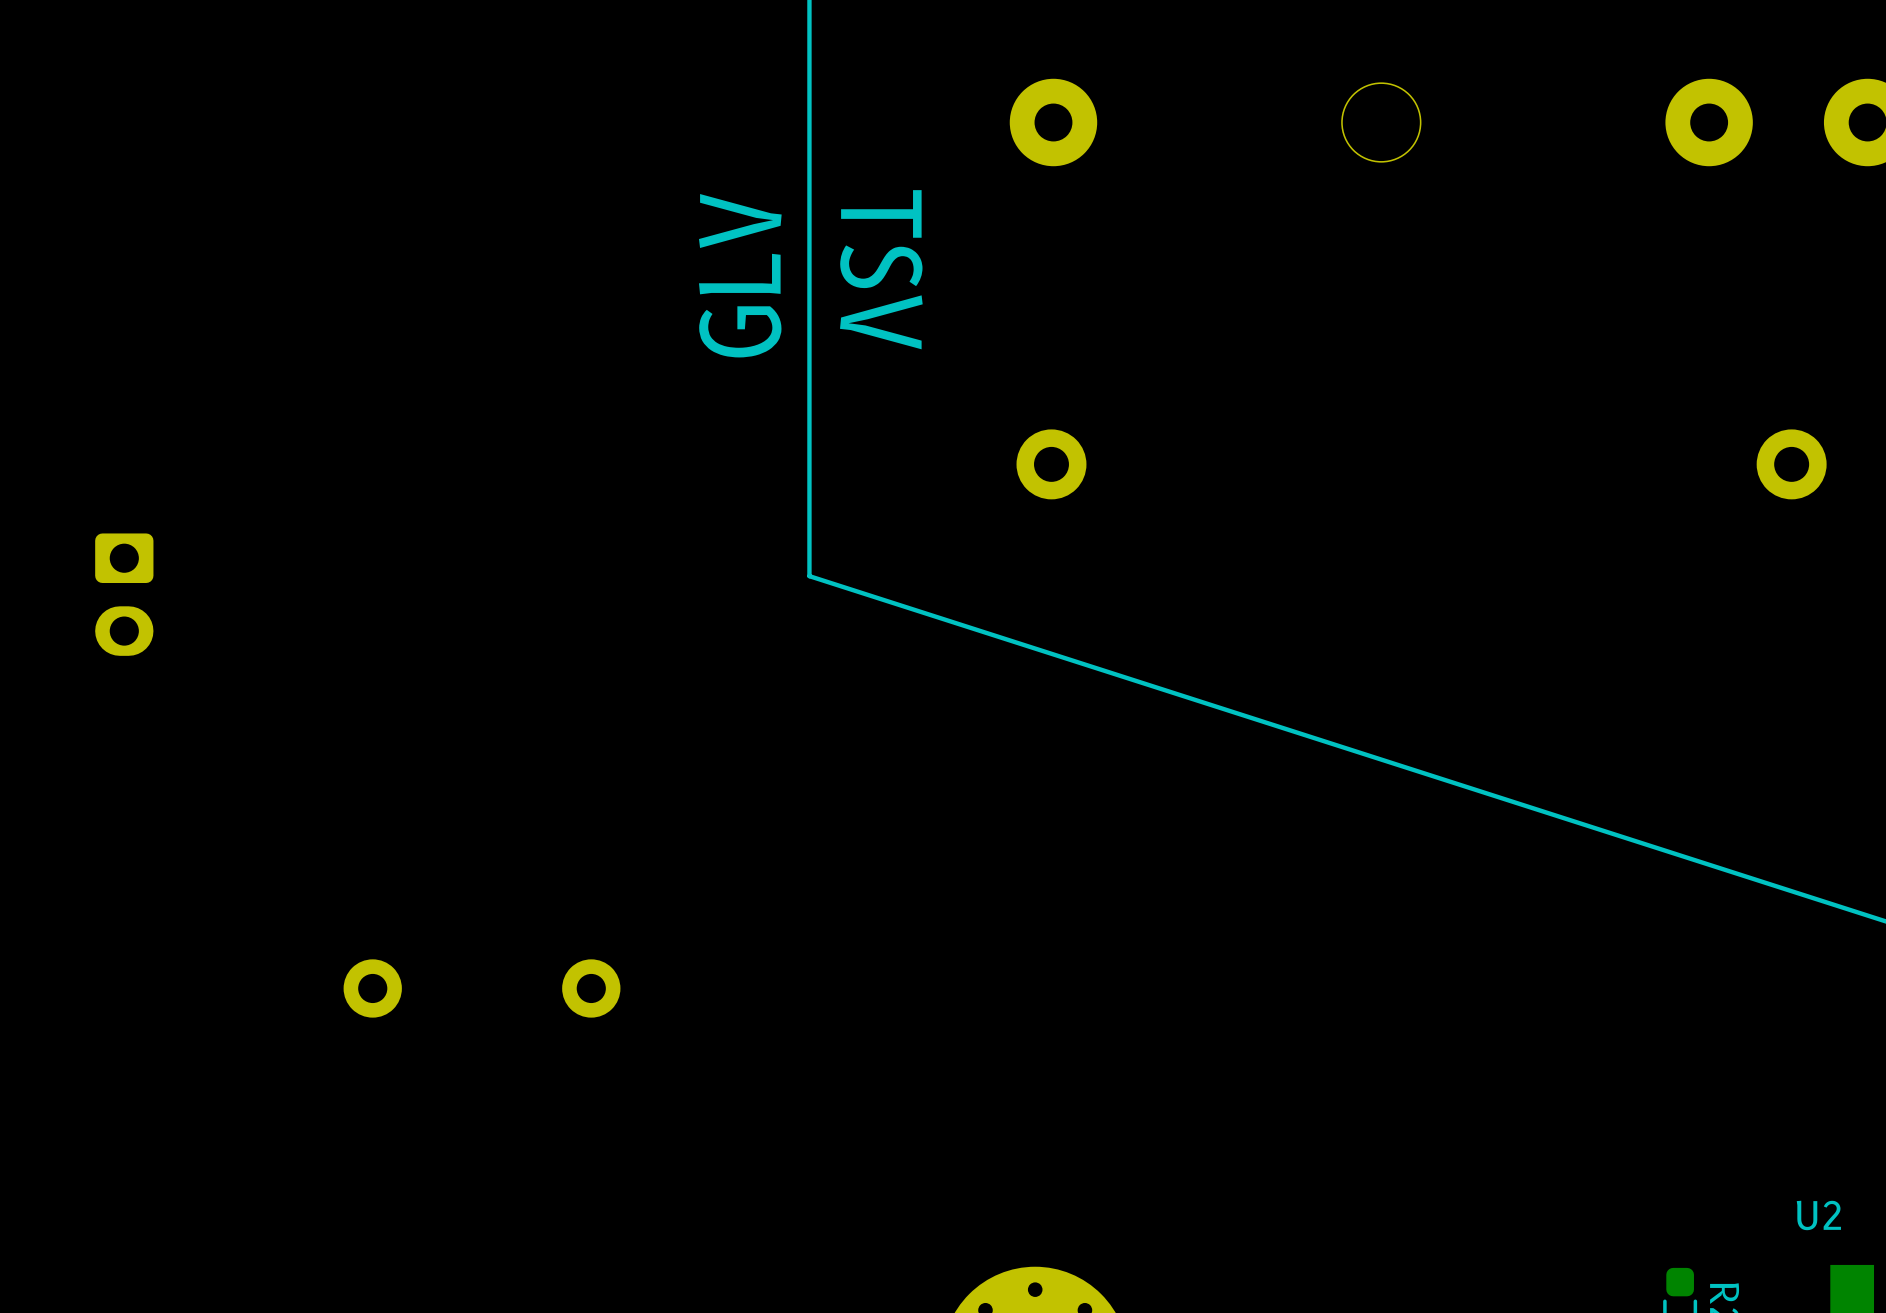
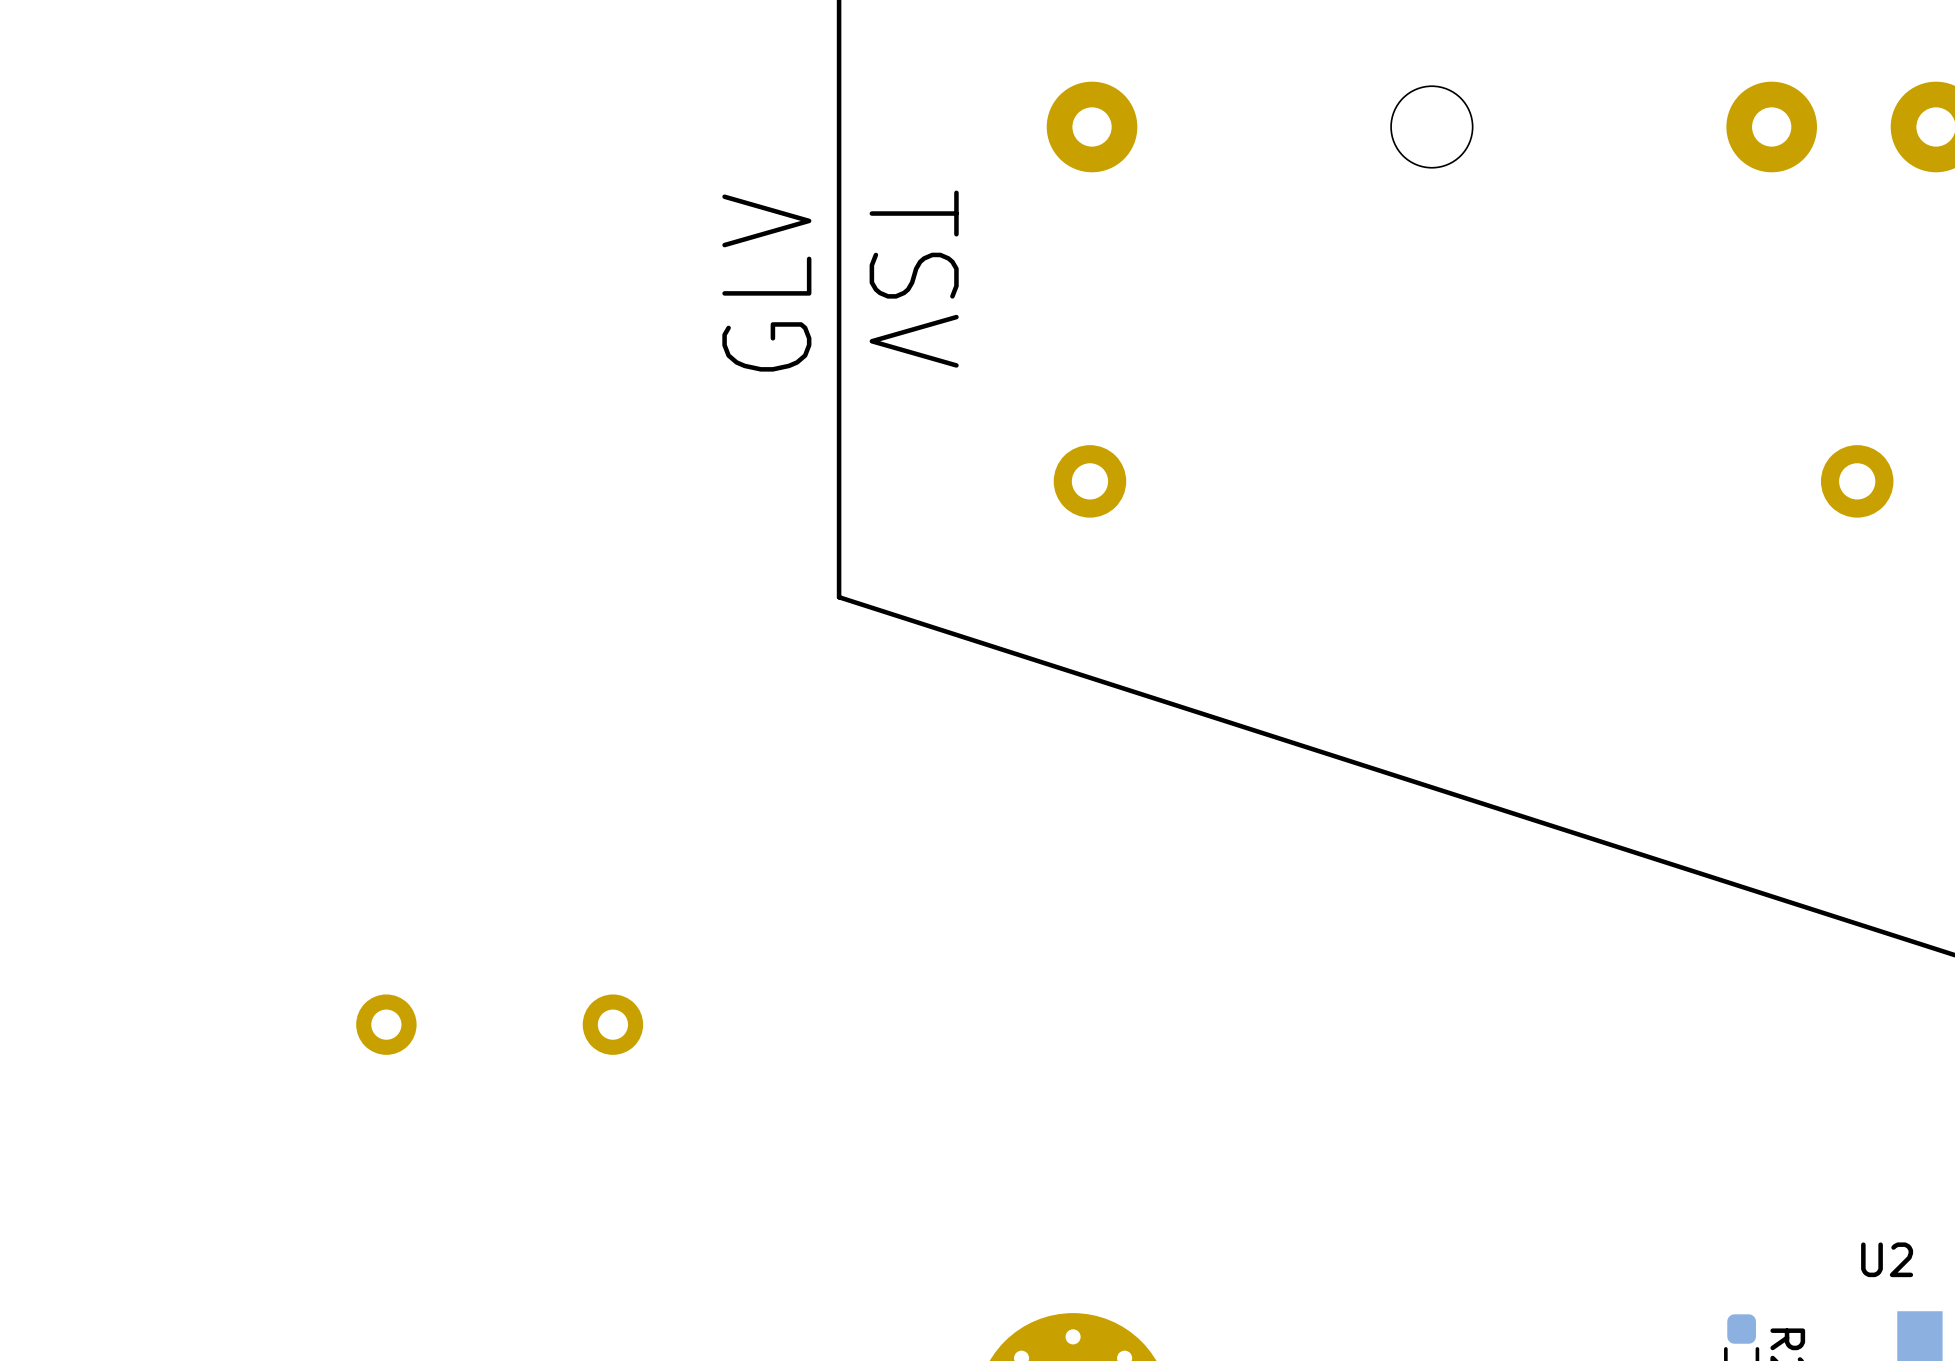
part: (124, 594) -> none

